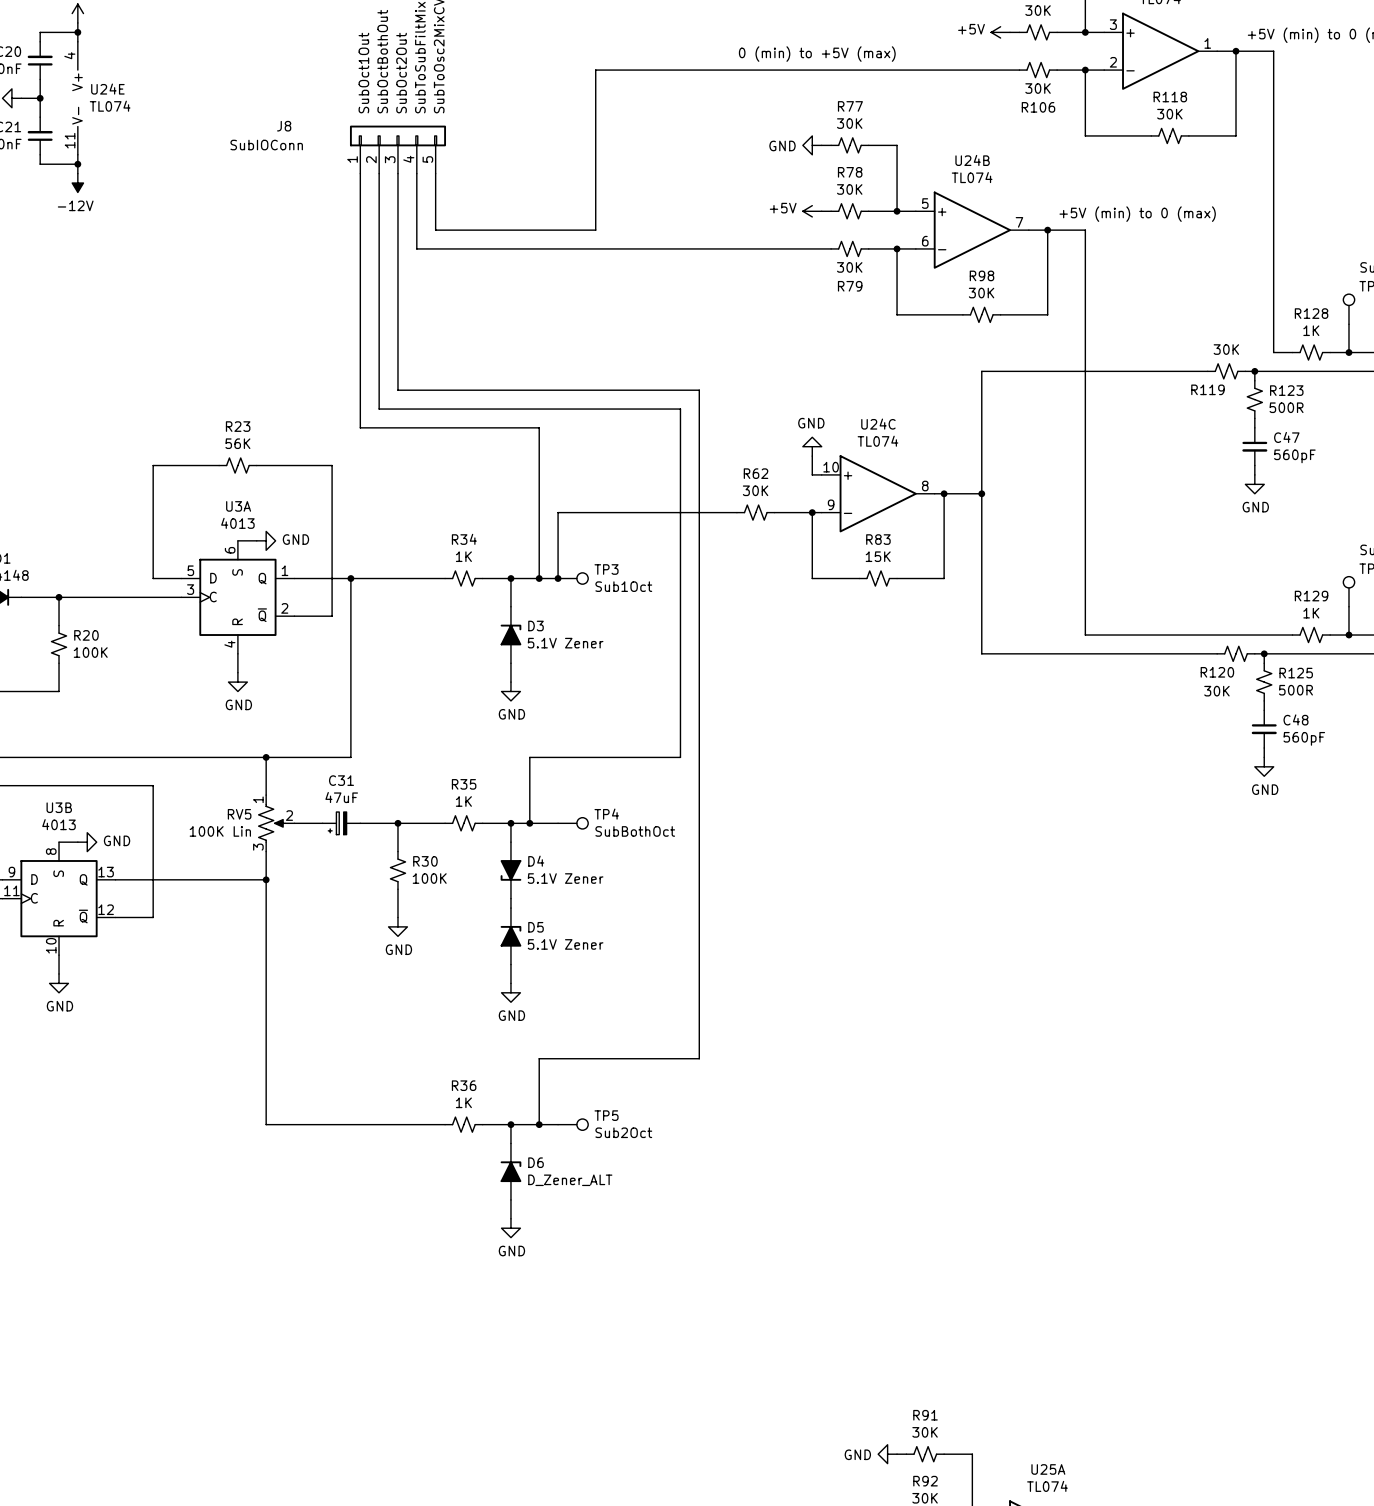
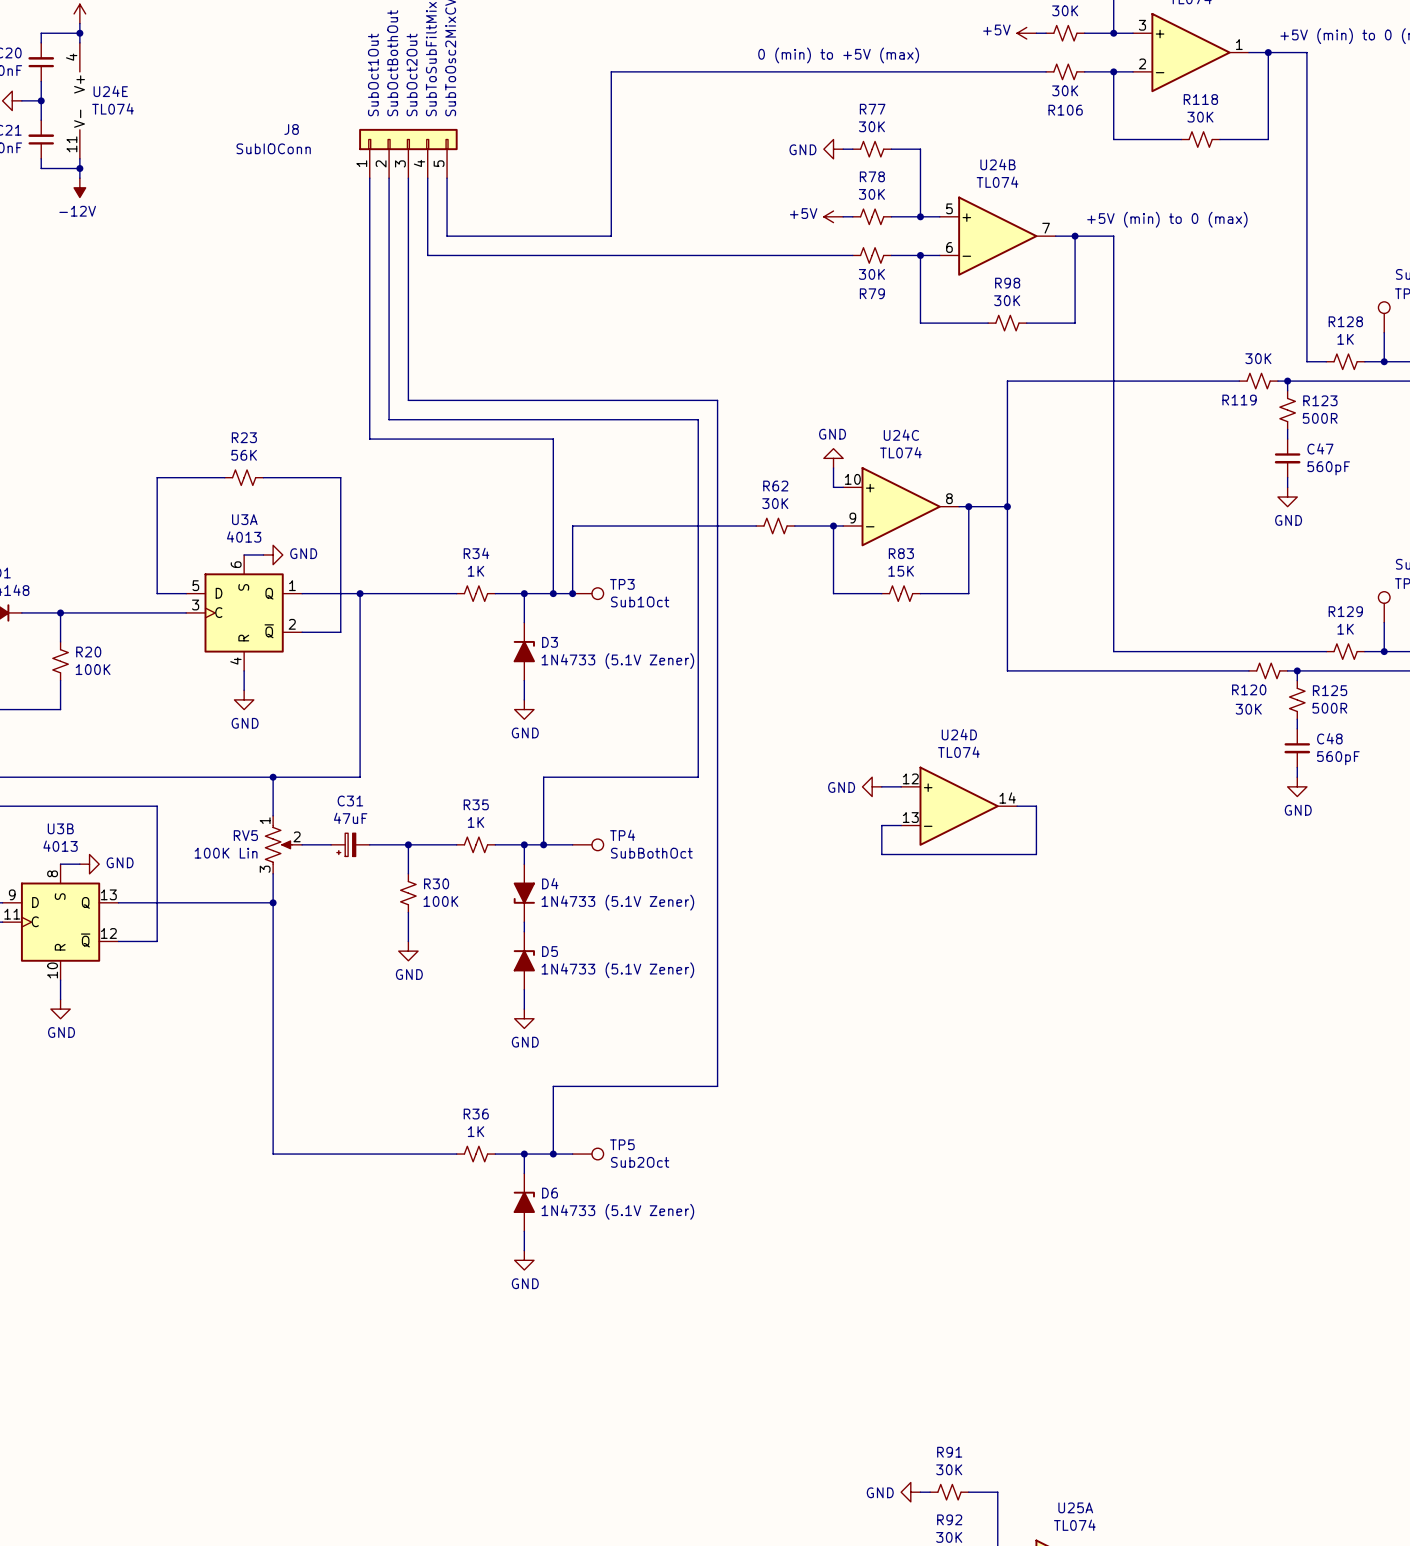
D3 value: 5.1V Zener (565, 643) -> 1N4733 (5.1V Zener) (617, 661)
power symbol: none -> GND (872, 786)
wire: none -> (881, 786) (901, 786)
U24D: none -> TL074 (959, 806)
wire: none -> (1017, 806) (1036, 806) (1036, 854) (881, 854) (881, 825) (901, 825)
D4 value: 5.1V Zener (565, 878) -> 1N4733 (5.1V Zener) (617, 902)
D5 value: 5.1V Zener (565, 944) -> 1N4733 (5.1V Zener) (617, 970)
D6 value: D_Zener_ALT (570, 1180) -> 1N4733 (5.1V Zener) (617, 1211)

